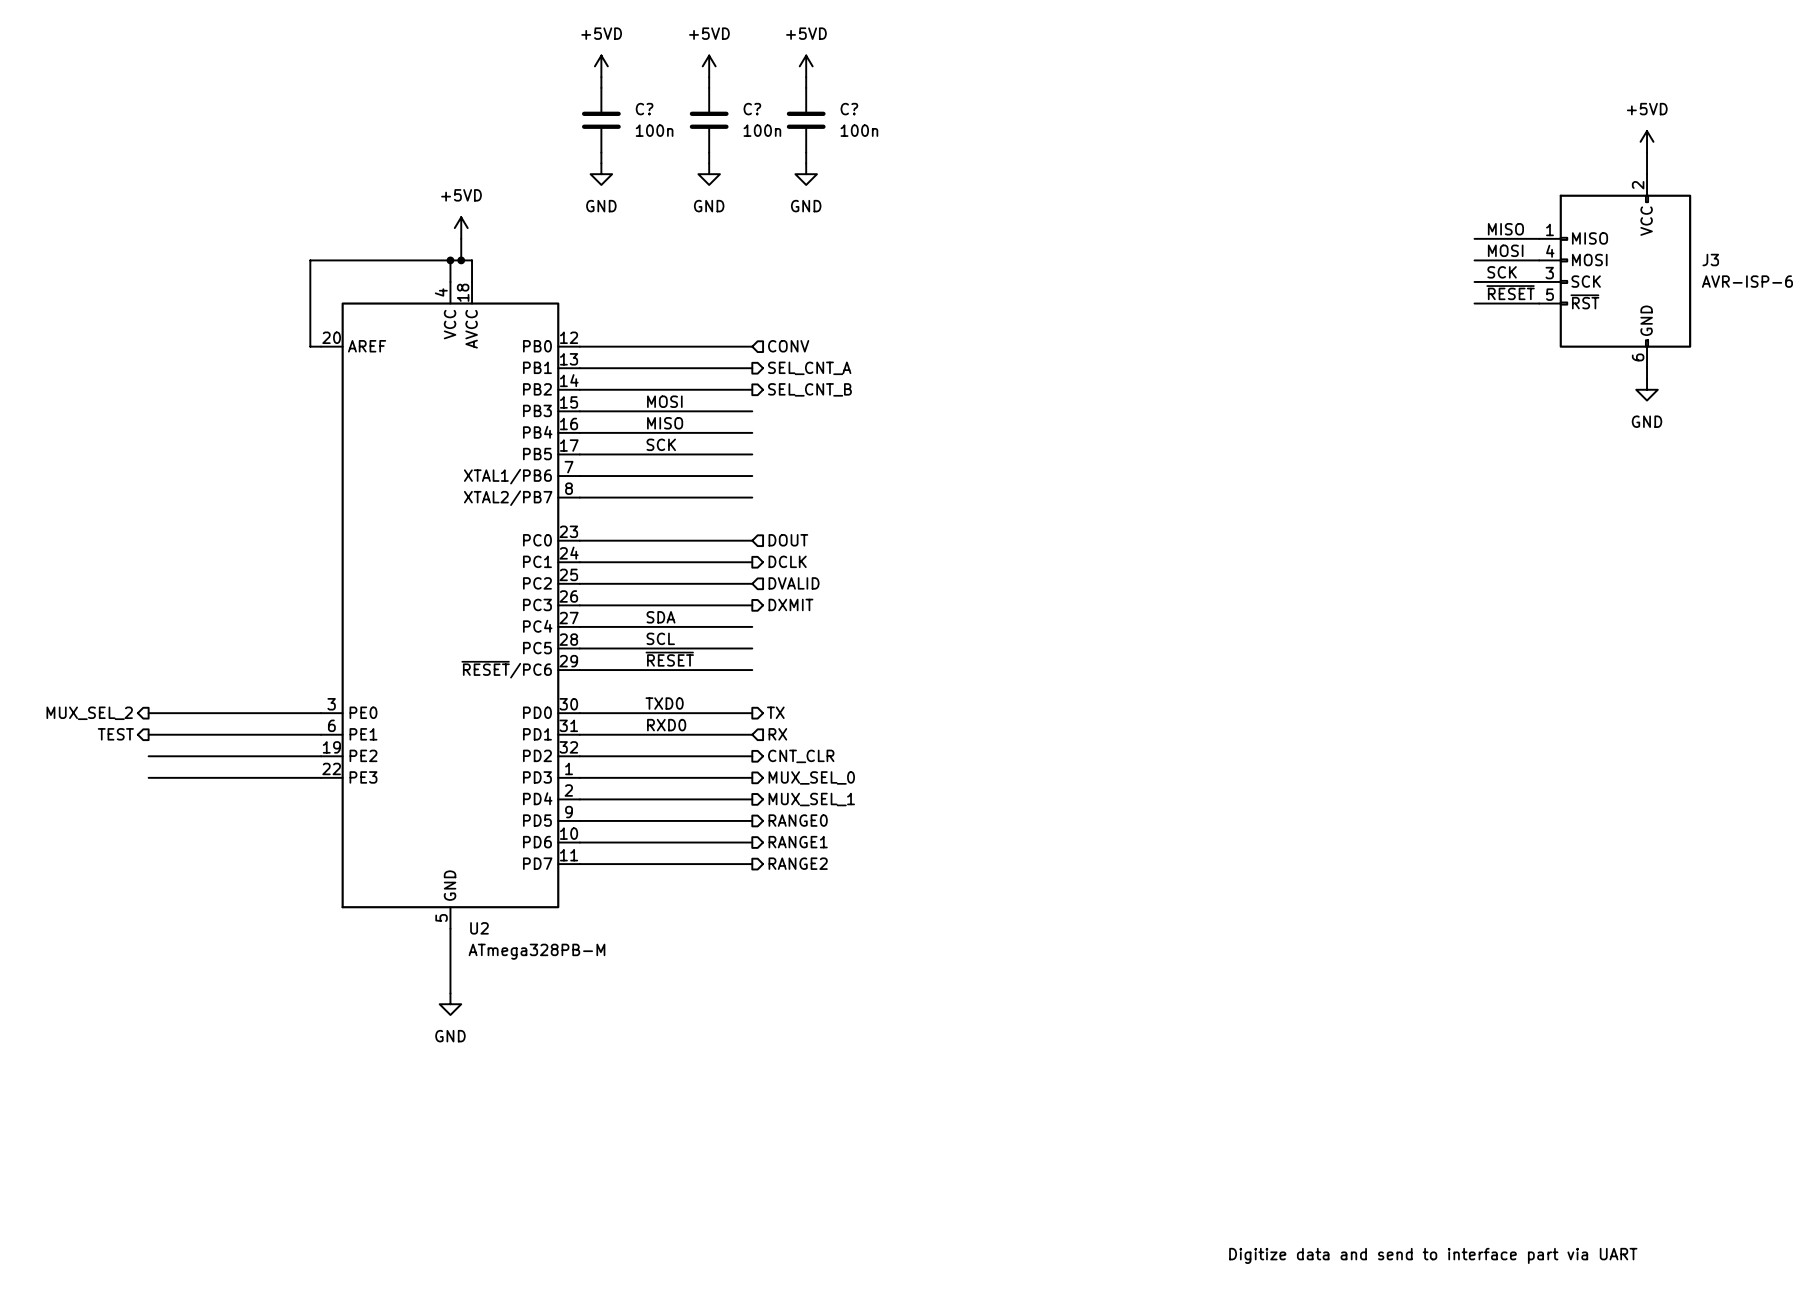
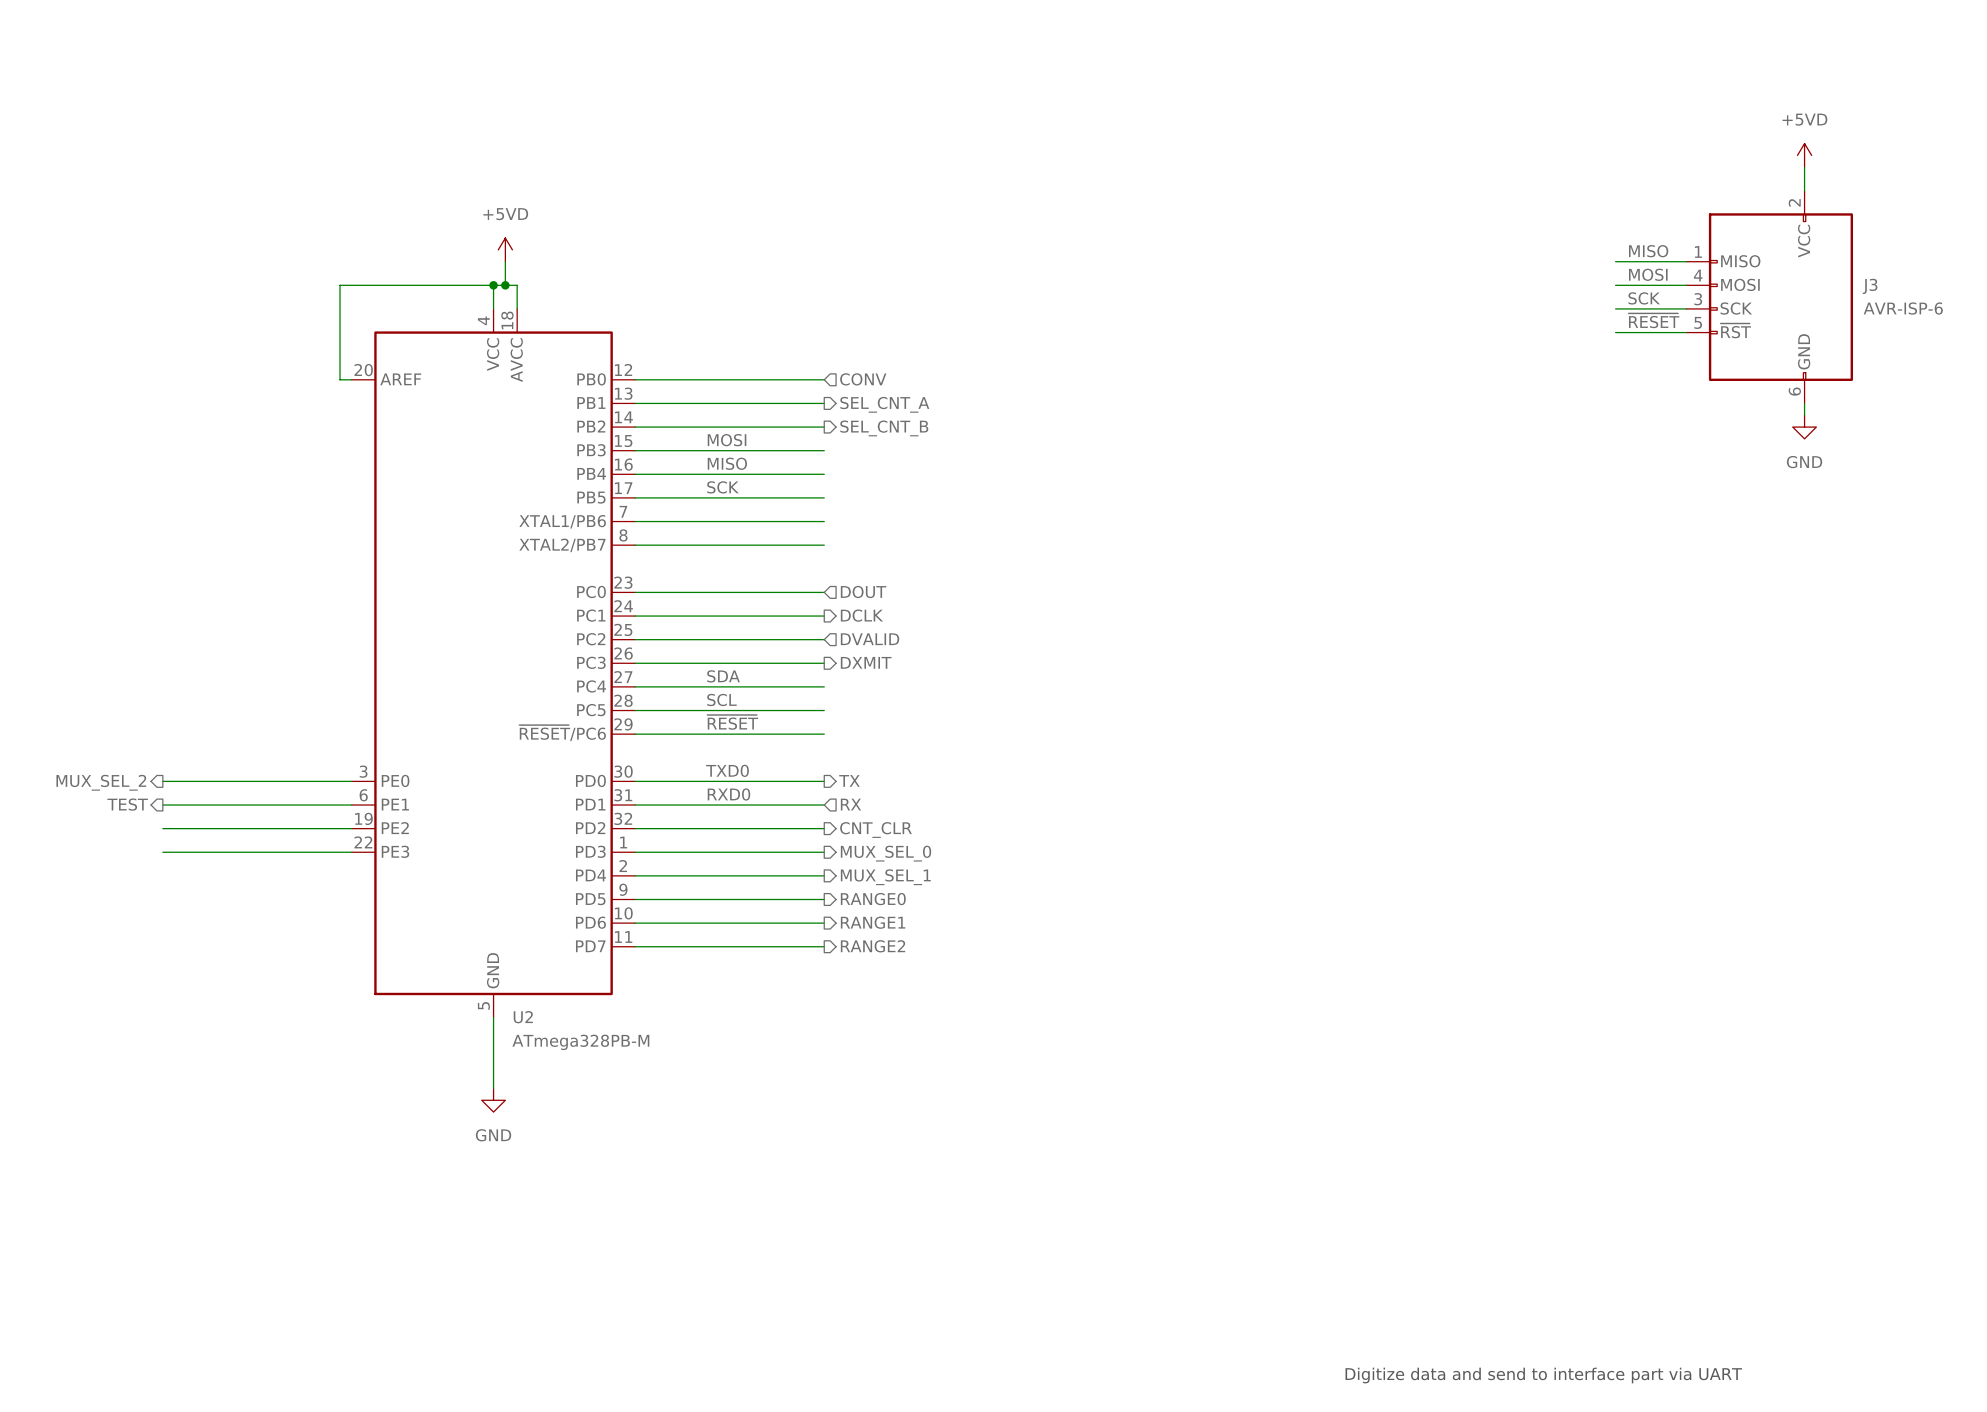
power symbol: +5VD (601, 66) -> none
power symbol: +5VD (709, 66) -> none
power symbol: +5VD (806, 66) -> none
wire: (601, 77) (601, 87) -> none
wire: (709, 77) (709, 87) -> none
wire: (806, 77) (806, 87) -> none
C?: 100n (601, 120) -> none
C?: 100n (709, 120) -> none
C?: 100n (806, 120) -> none
wire: (601, 152) (601, 163) -> none
wire: (709, 152) (709, 163) -> none
wire: (806, 152) (806, 163) -> none
power symbol: GND (601, 174) -> none
power symbol: GND (709, 174) -> none
power symbol: GND (806, 174) -> none

